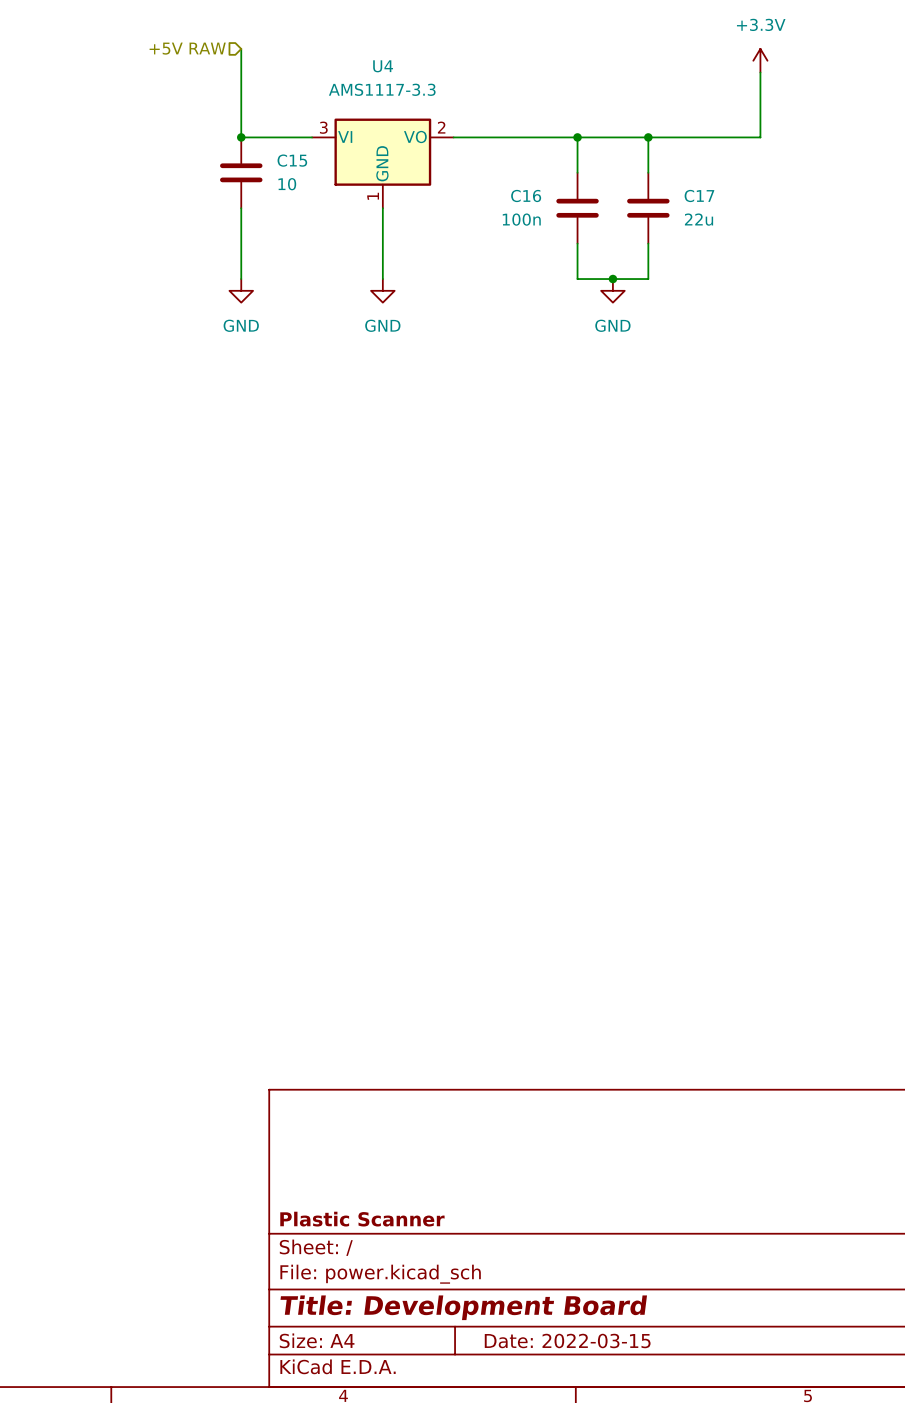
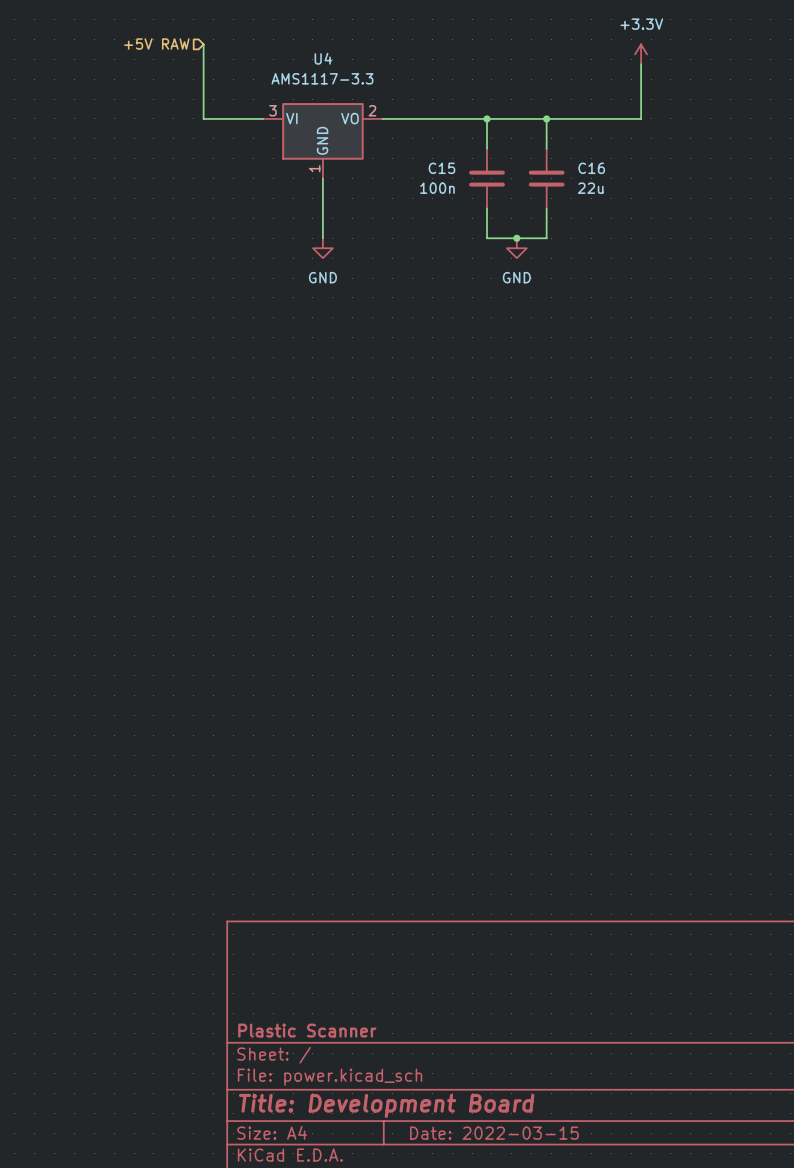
junction: (241, 137) -> none
C15: 10 (241, 172) -> none
C16 name: C16 (526, 195) -> C15 (441, 168)
C17 name: C17 (699, 195) -> C16 (591, 168)
wire: (241, 208) (241, 279) -> none
power symbol: GND (241, 290) -> none

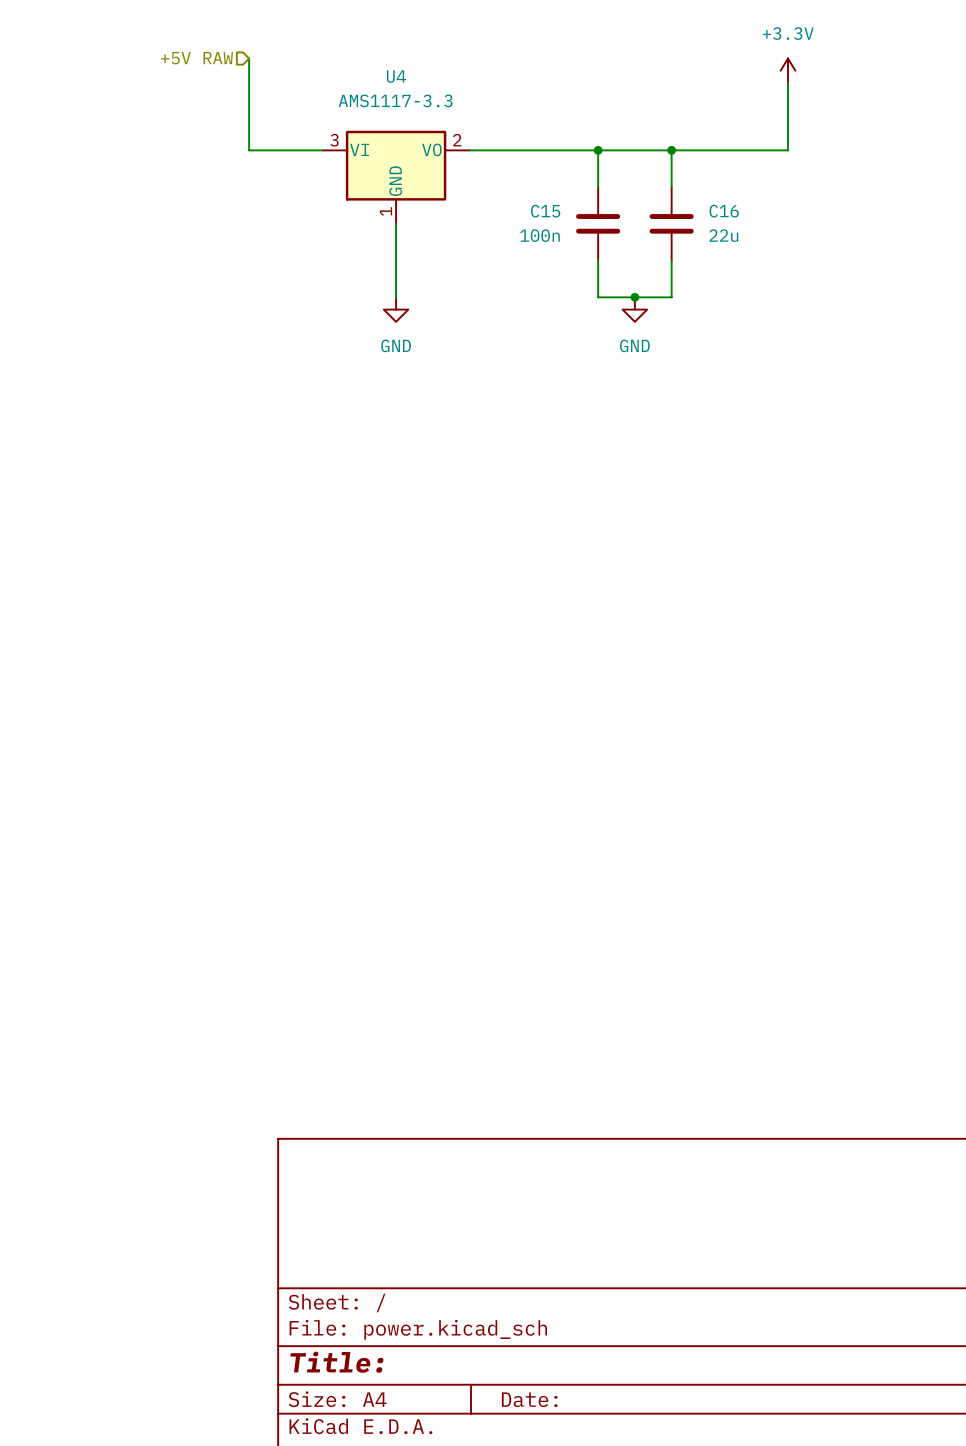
title block: Plastic Scanner (307, 1030) -> none
title block: Title: Development Board (386, 1105) -> Title: (336, 1362)
title block: Date: 2022-03-15 (494, 1133) -> Date: (529, 1399)

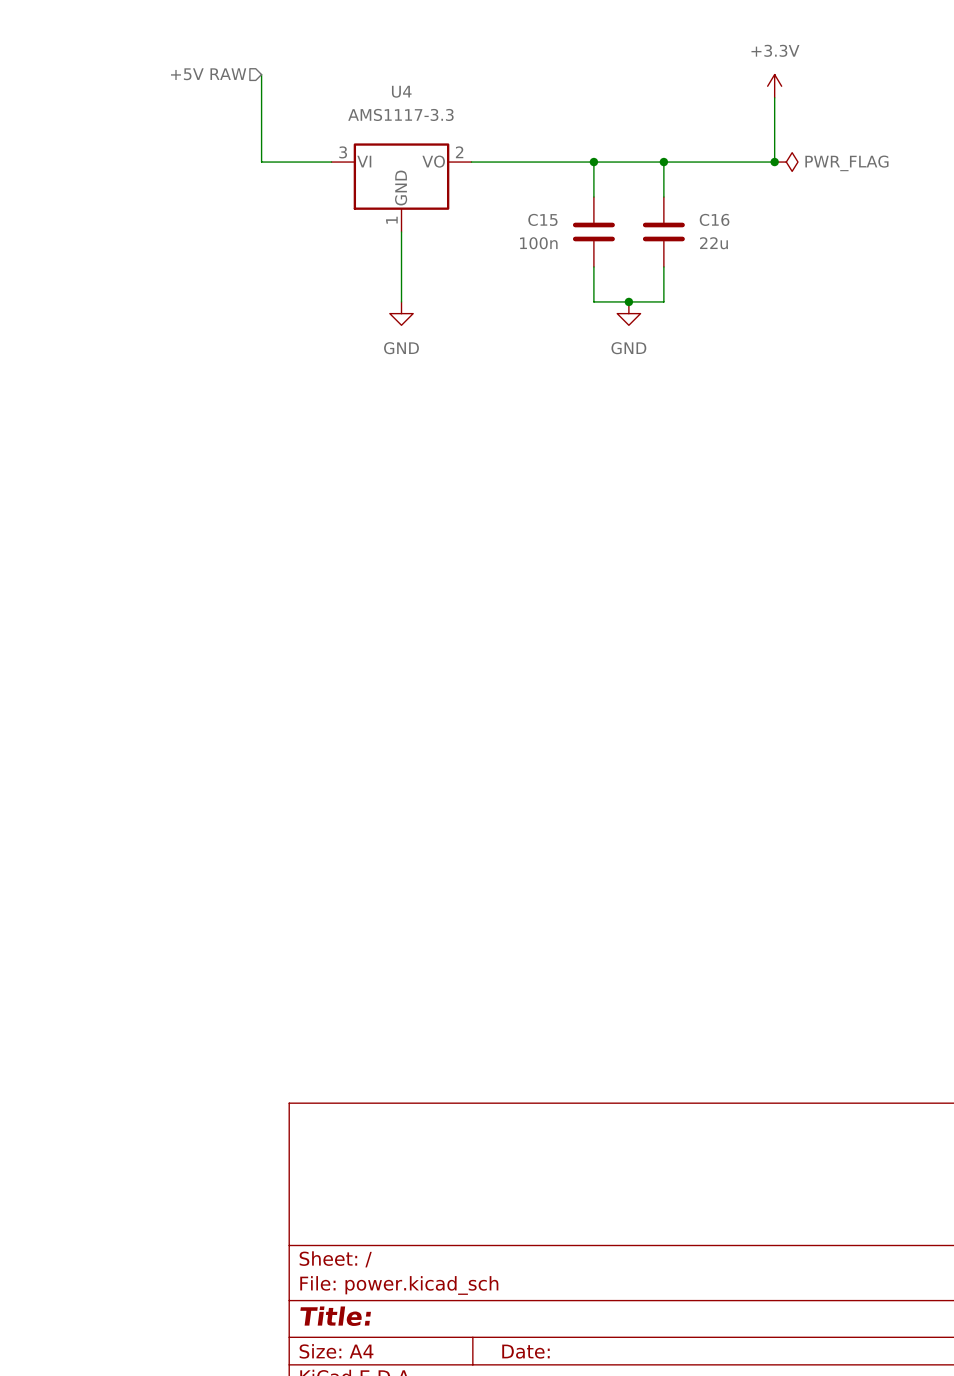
junction: none -> (774, 162)
power symbol: none -> PWR_FLAG (786, 162)

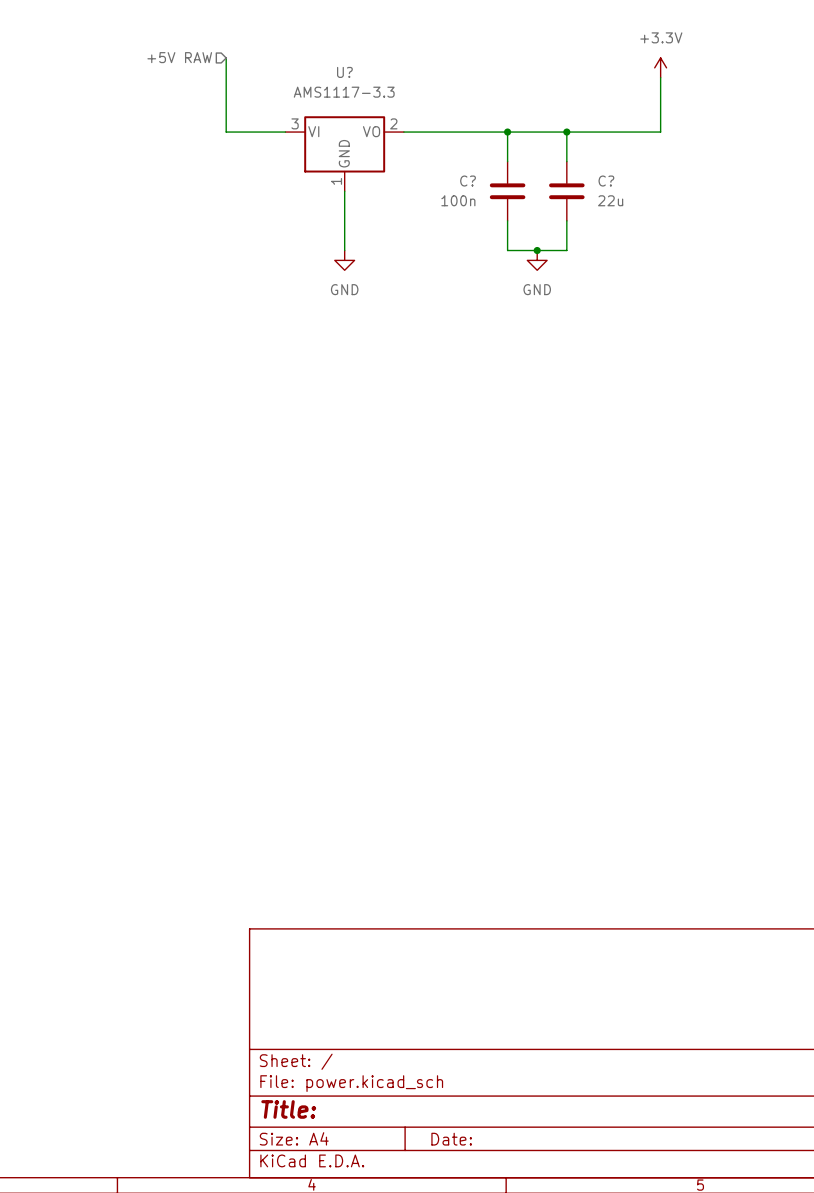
U4 name: U4 (401, 91) -> U? (344, 72)
junction: (774, 162) -> none
power symbol: PWR_FLAG (786, 162) -> none
C15 name: C15 (542, 219) -> C? (468, 181)
C16 name: C16 (714, 219) -> C? (606, 181)

